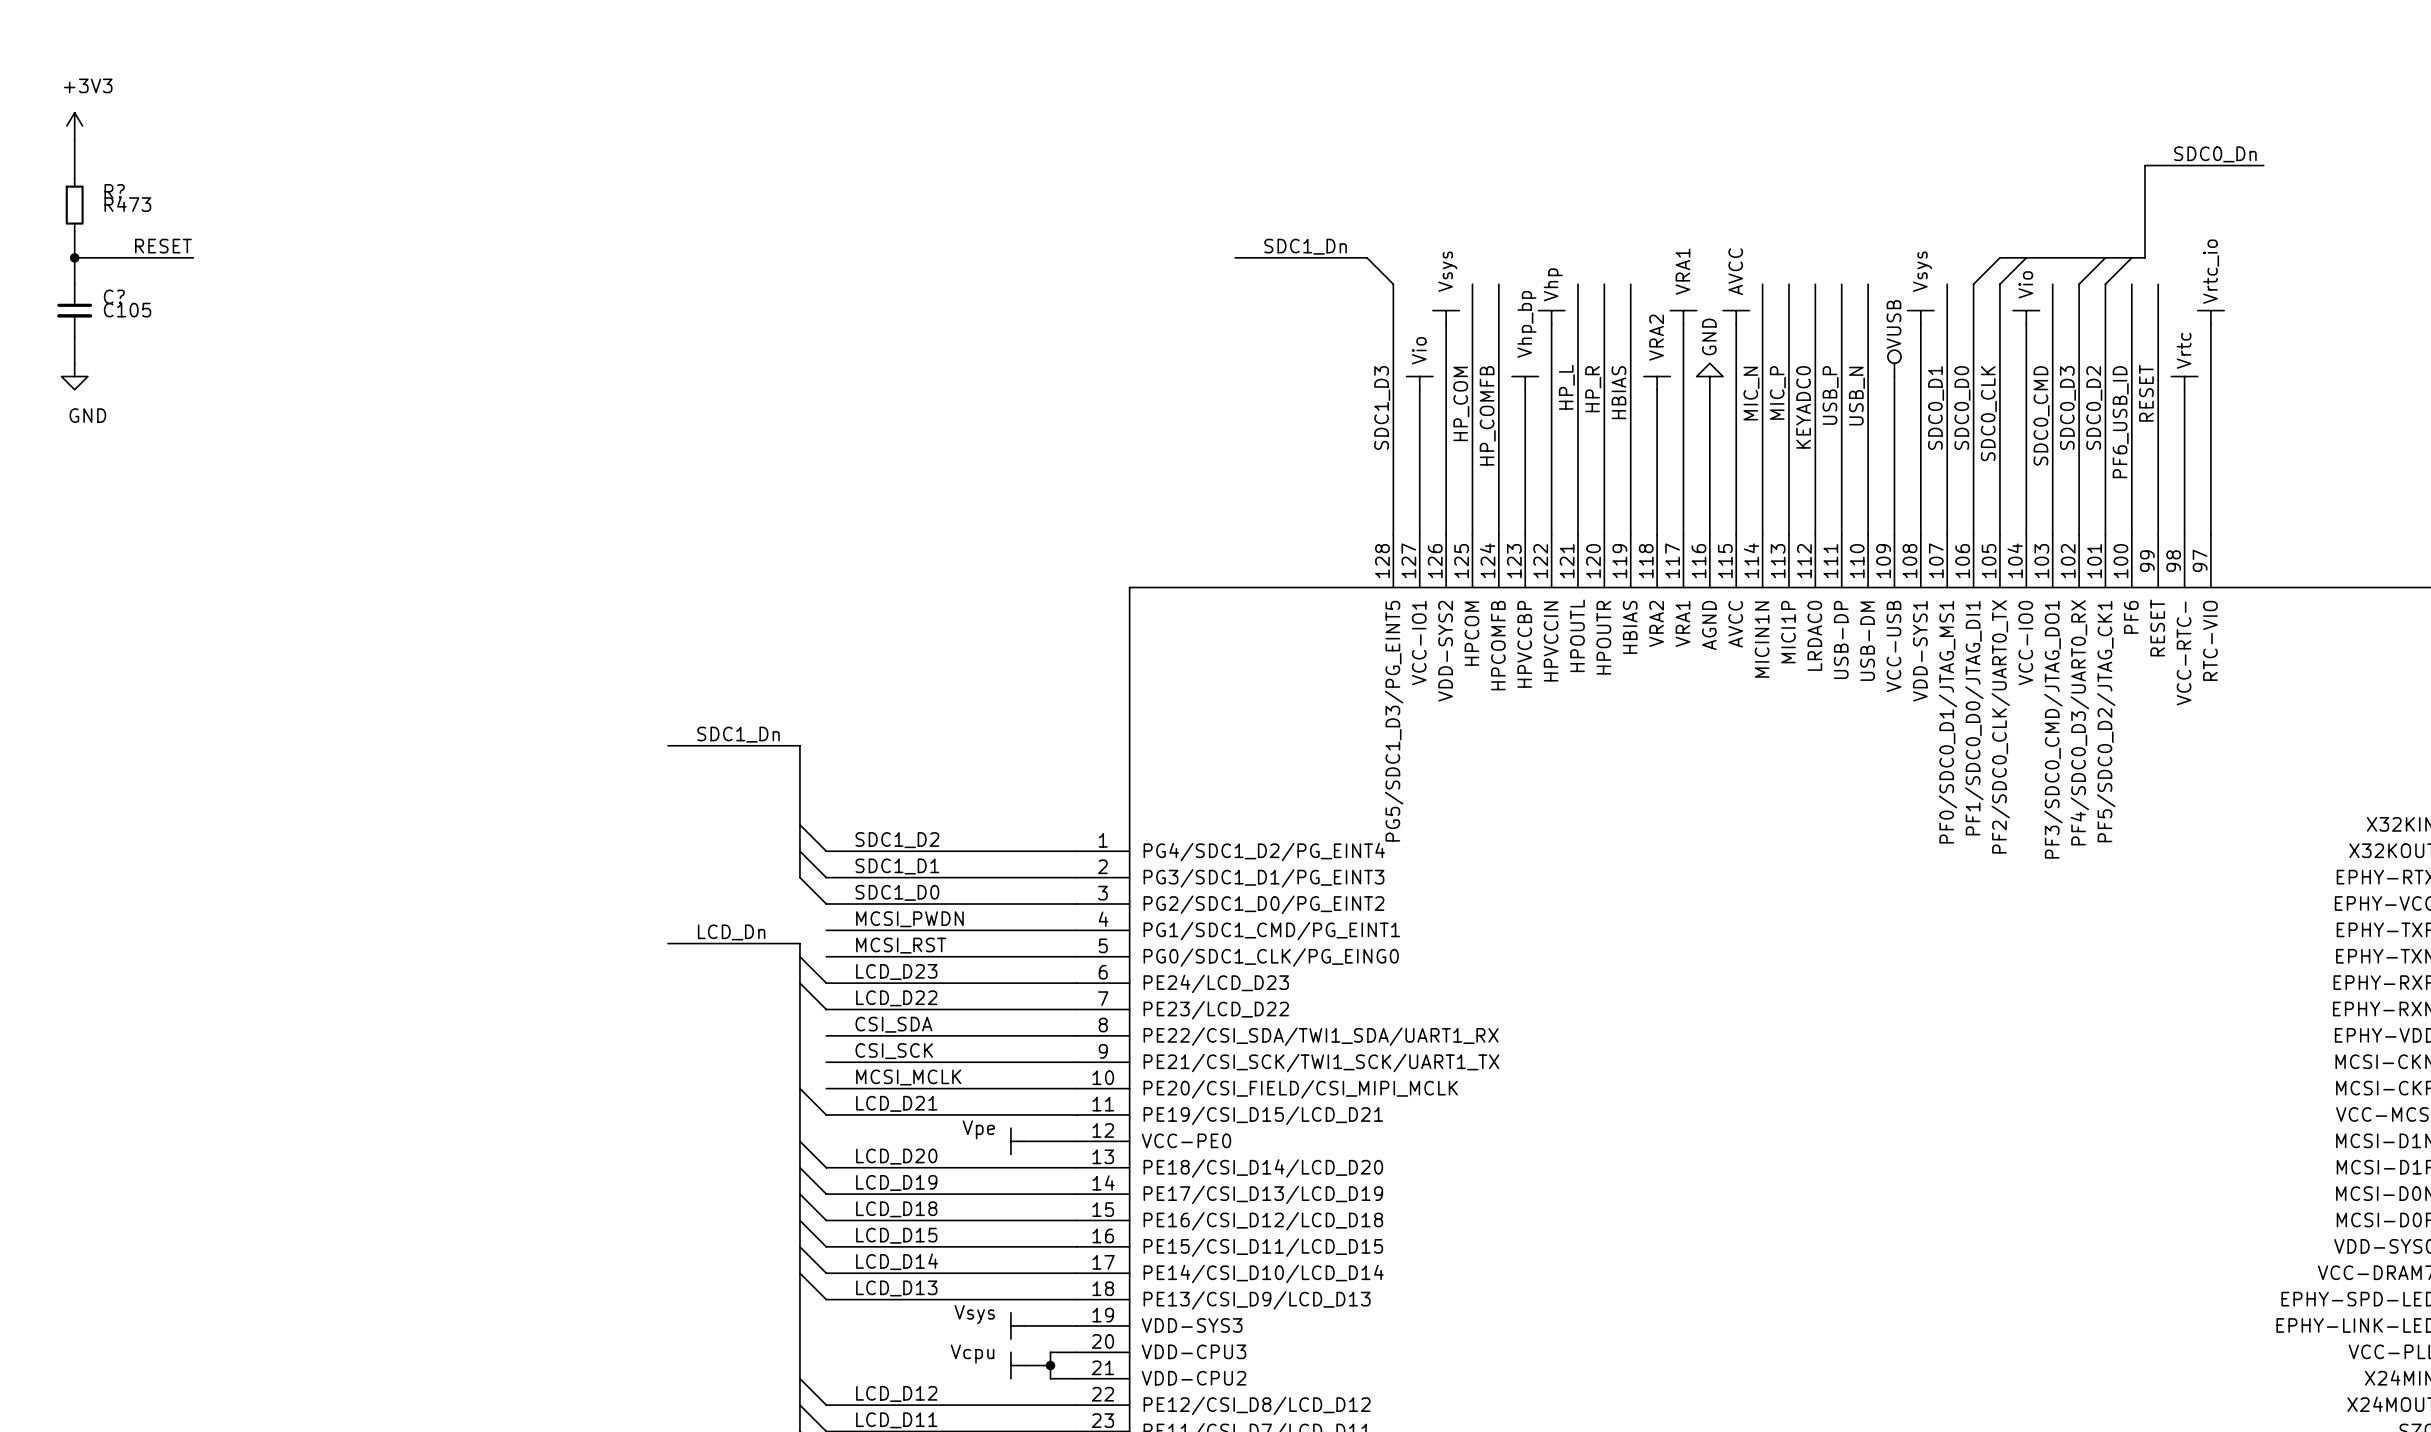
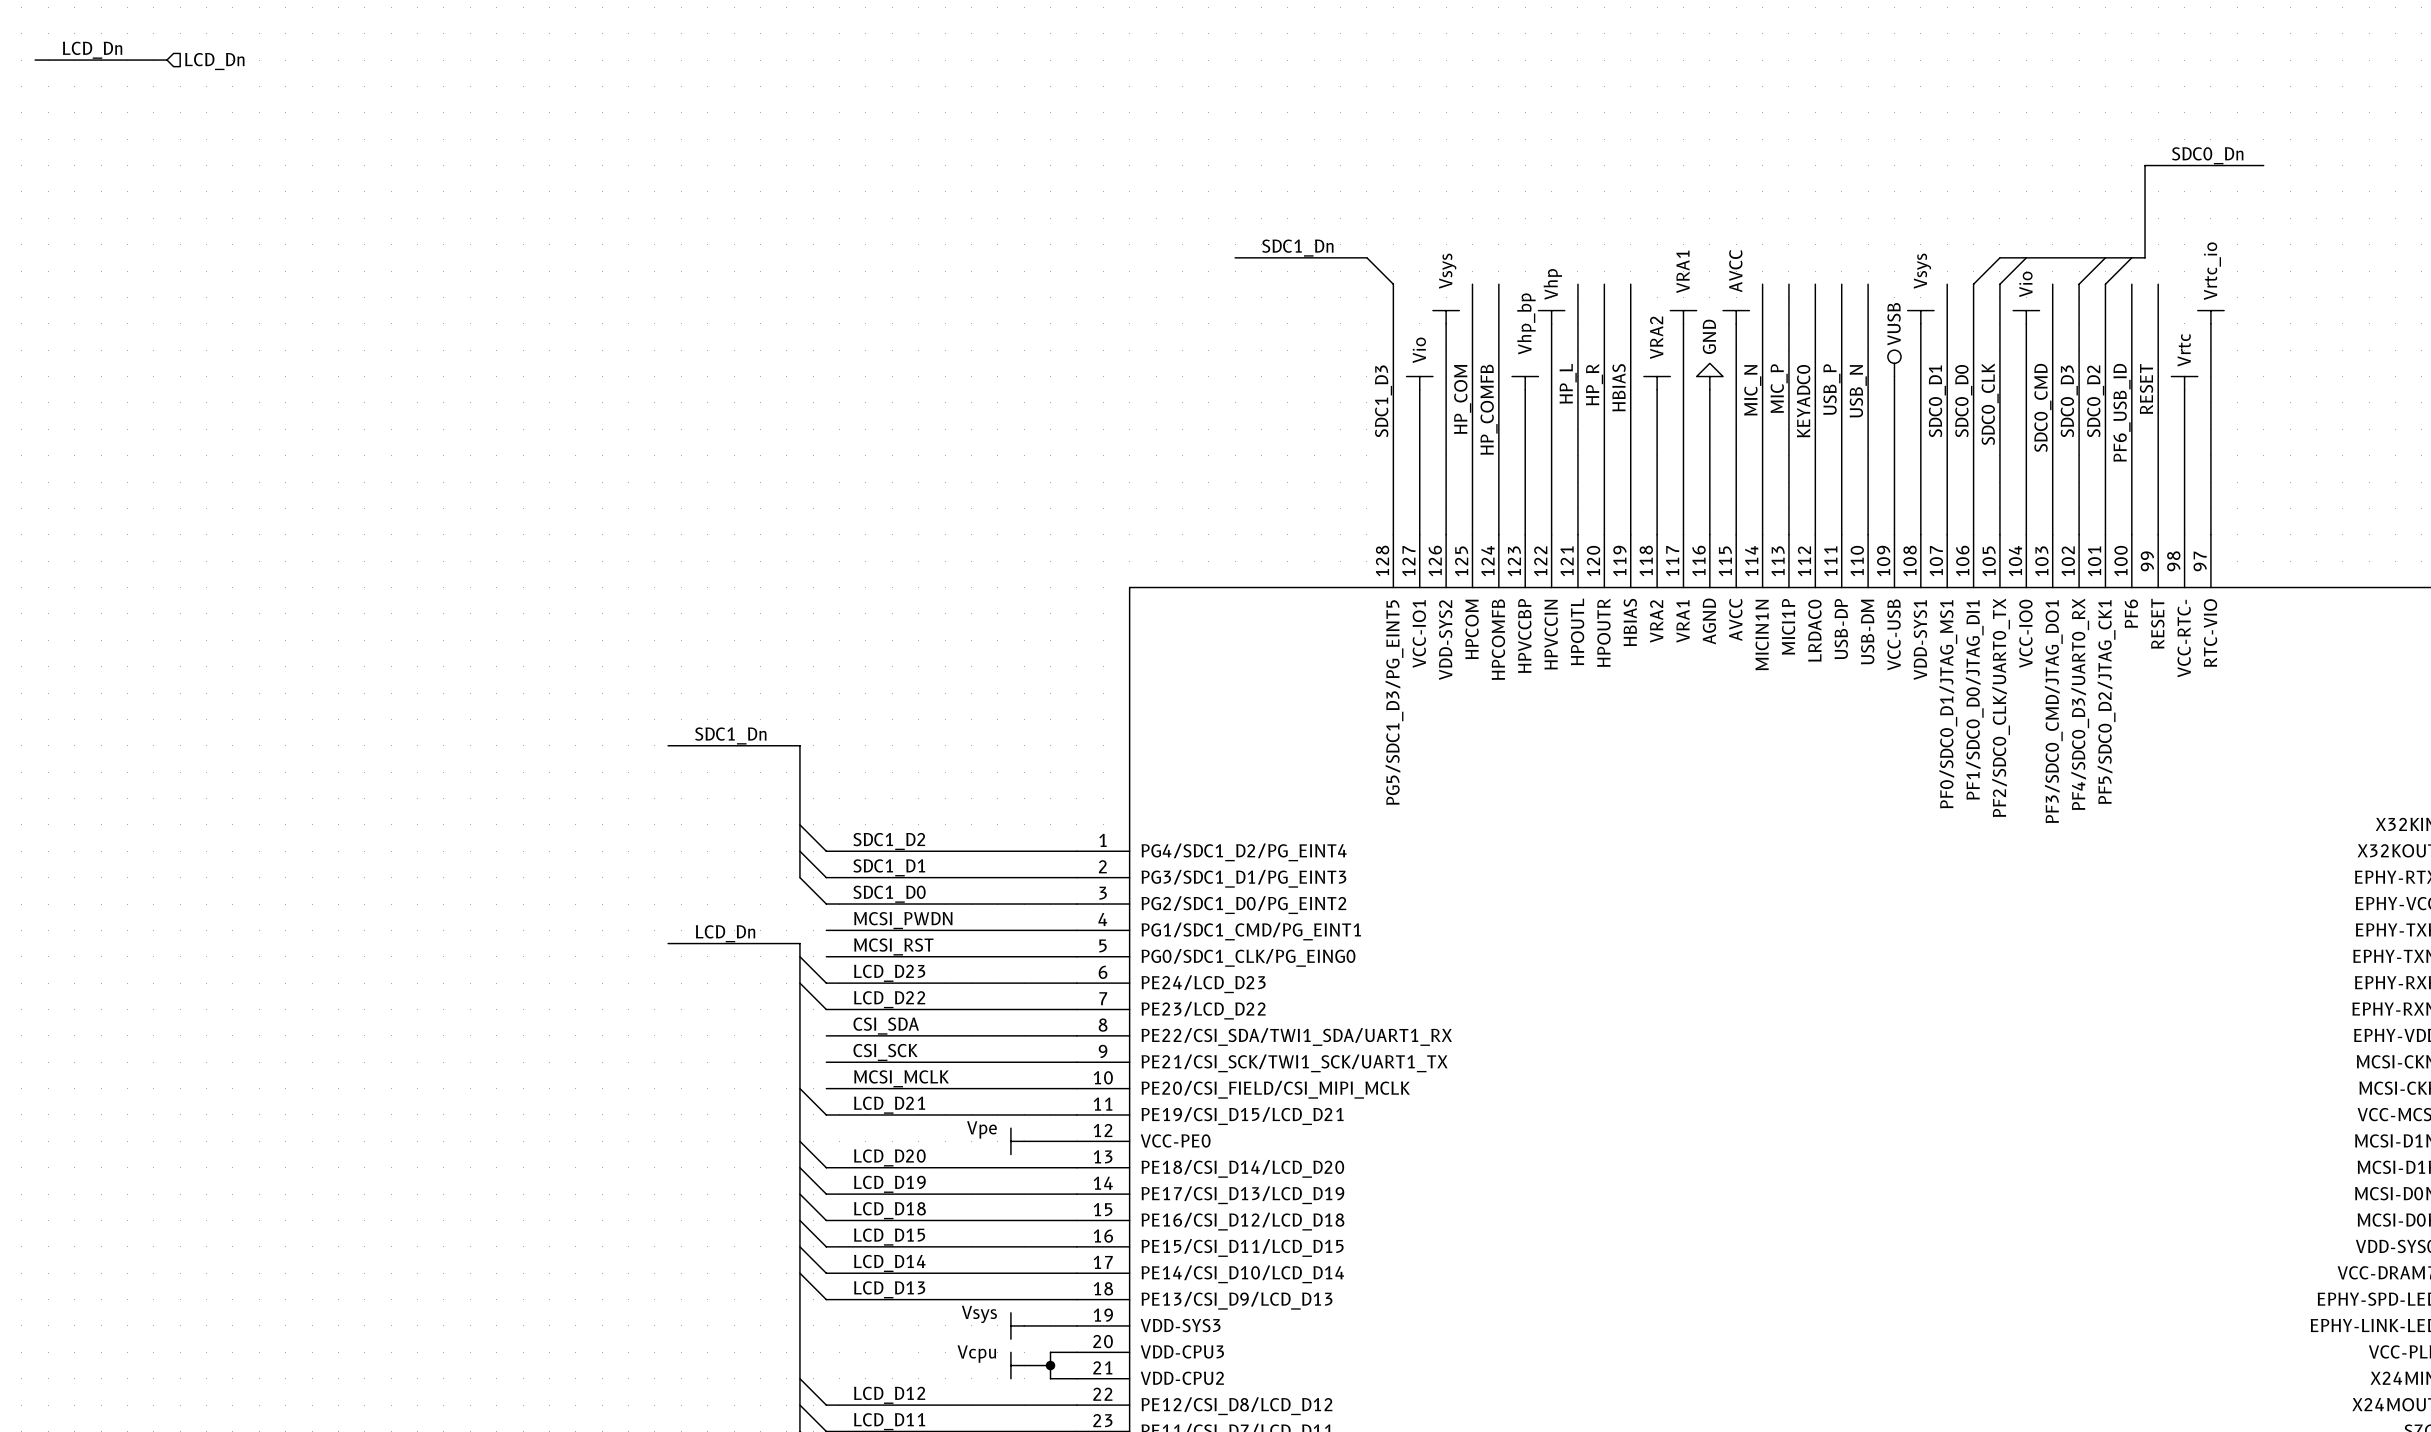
label: none -> LCD_Dn (92, 50)
bus: none -> (35, 60) (166, 60)
hierarchical label: none -> LCD_Dn (214, 61)
power symbol: +3V3 (74, 125) -> none
wire: (74, 139) (74, 178) -> none
R?: R473 (74, 205) -> none
wire: (74, 231) (74, 284) -> none
label: RESET (163, 246) -> none
wire: (74, 257) (193, 257) -> none
junction: (74, 257) -> none
C?: C105 (74, 310) -> none
wire: (74, 336) (74, 363) -> none
power symbol: GND (74, 376) -> none

